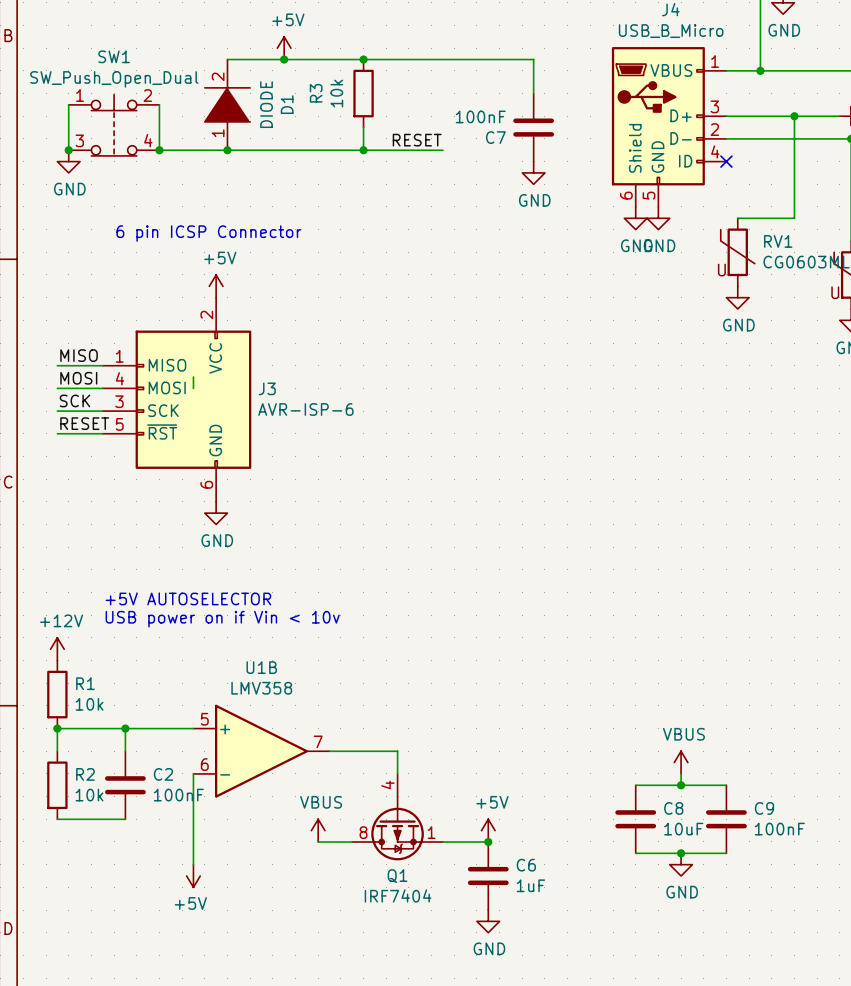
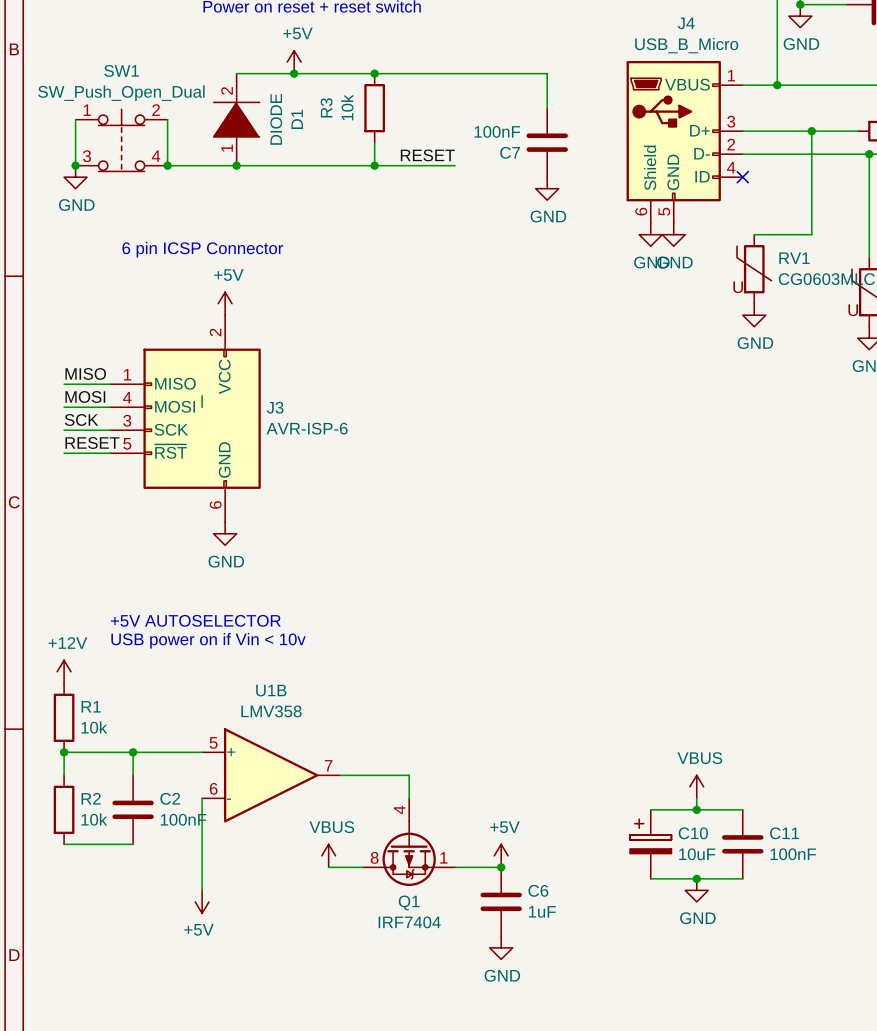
C9 name: C9 (764, 808) -> C11 (784, 833)
C8: 10uF (635, 819) -> none
C10: none -> 10uF (650, 844)

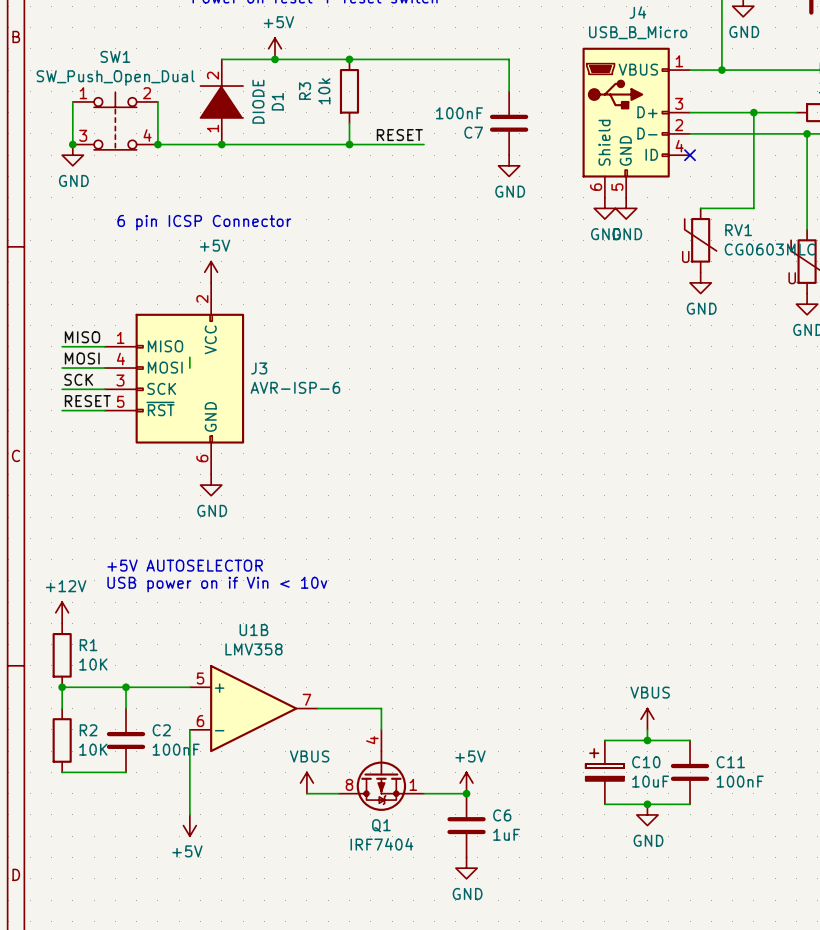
R1 value: 10k (94, 727) -> 10K (93, 664)
R2 value: 10k (94, 819) -> 10K (93, 749)

